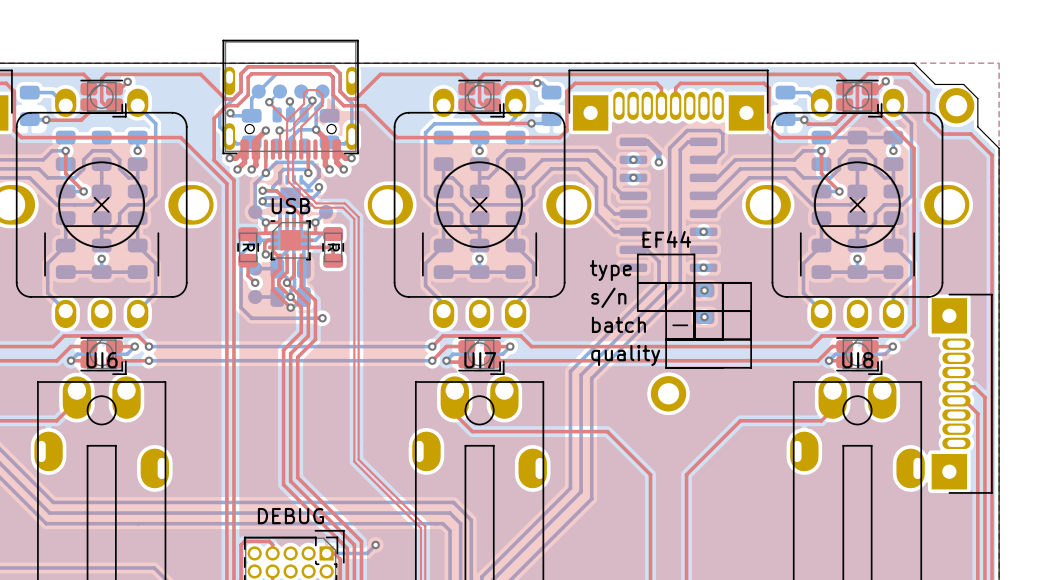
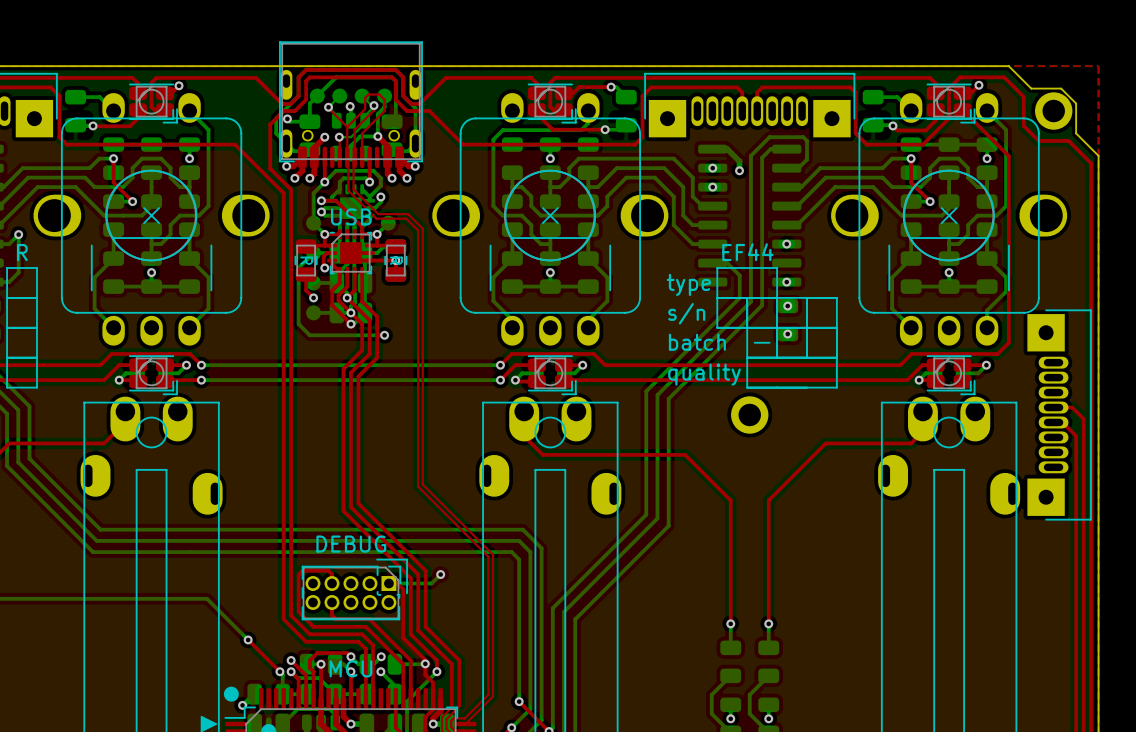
UI6 name: UI6 (102, 360) -> none
UI7 name: UI7 (480, 360) -> none
UI8 name: UI8 (857, 360) -> none

